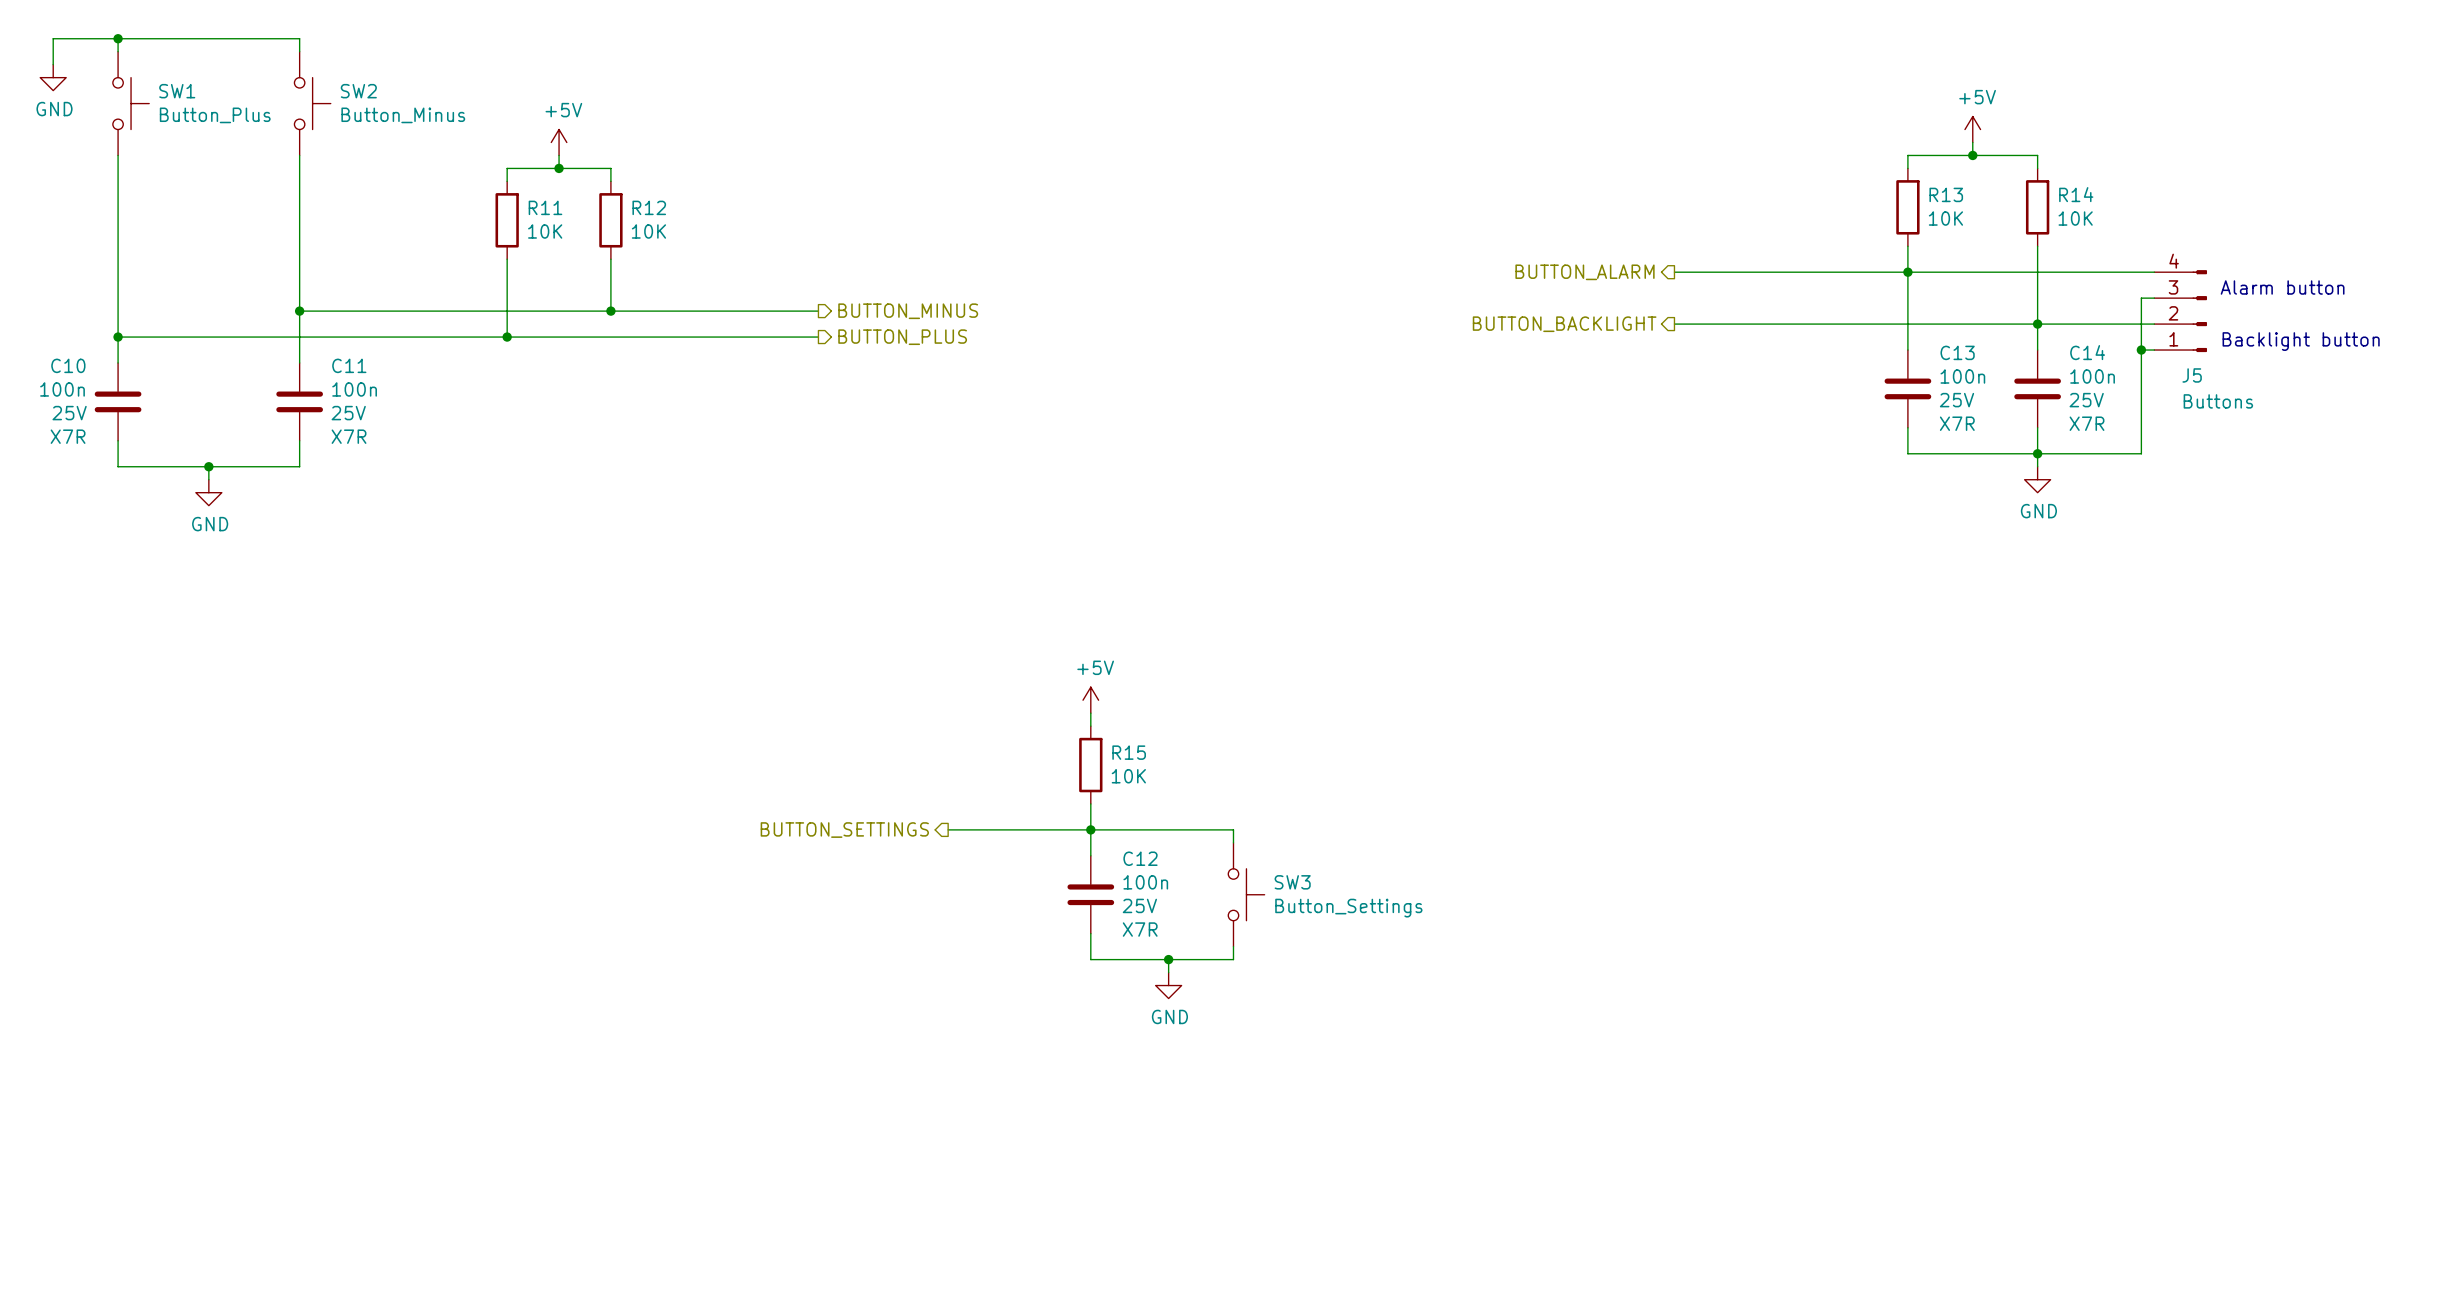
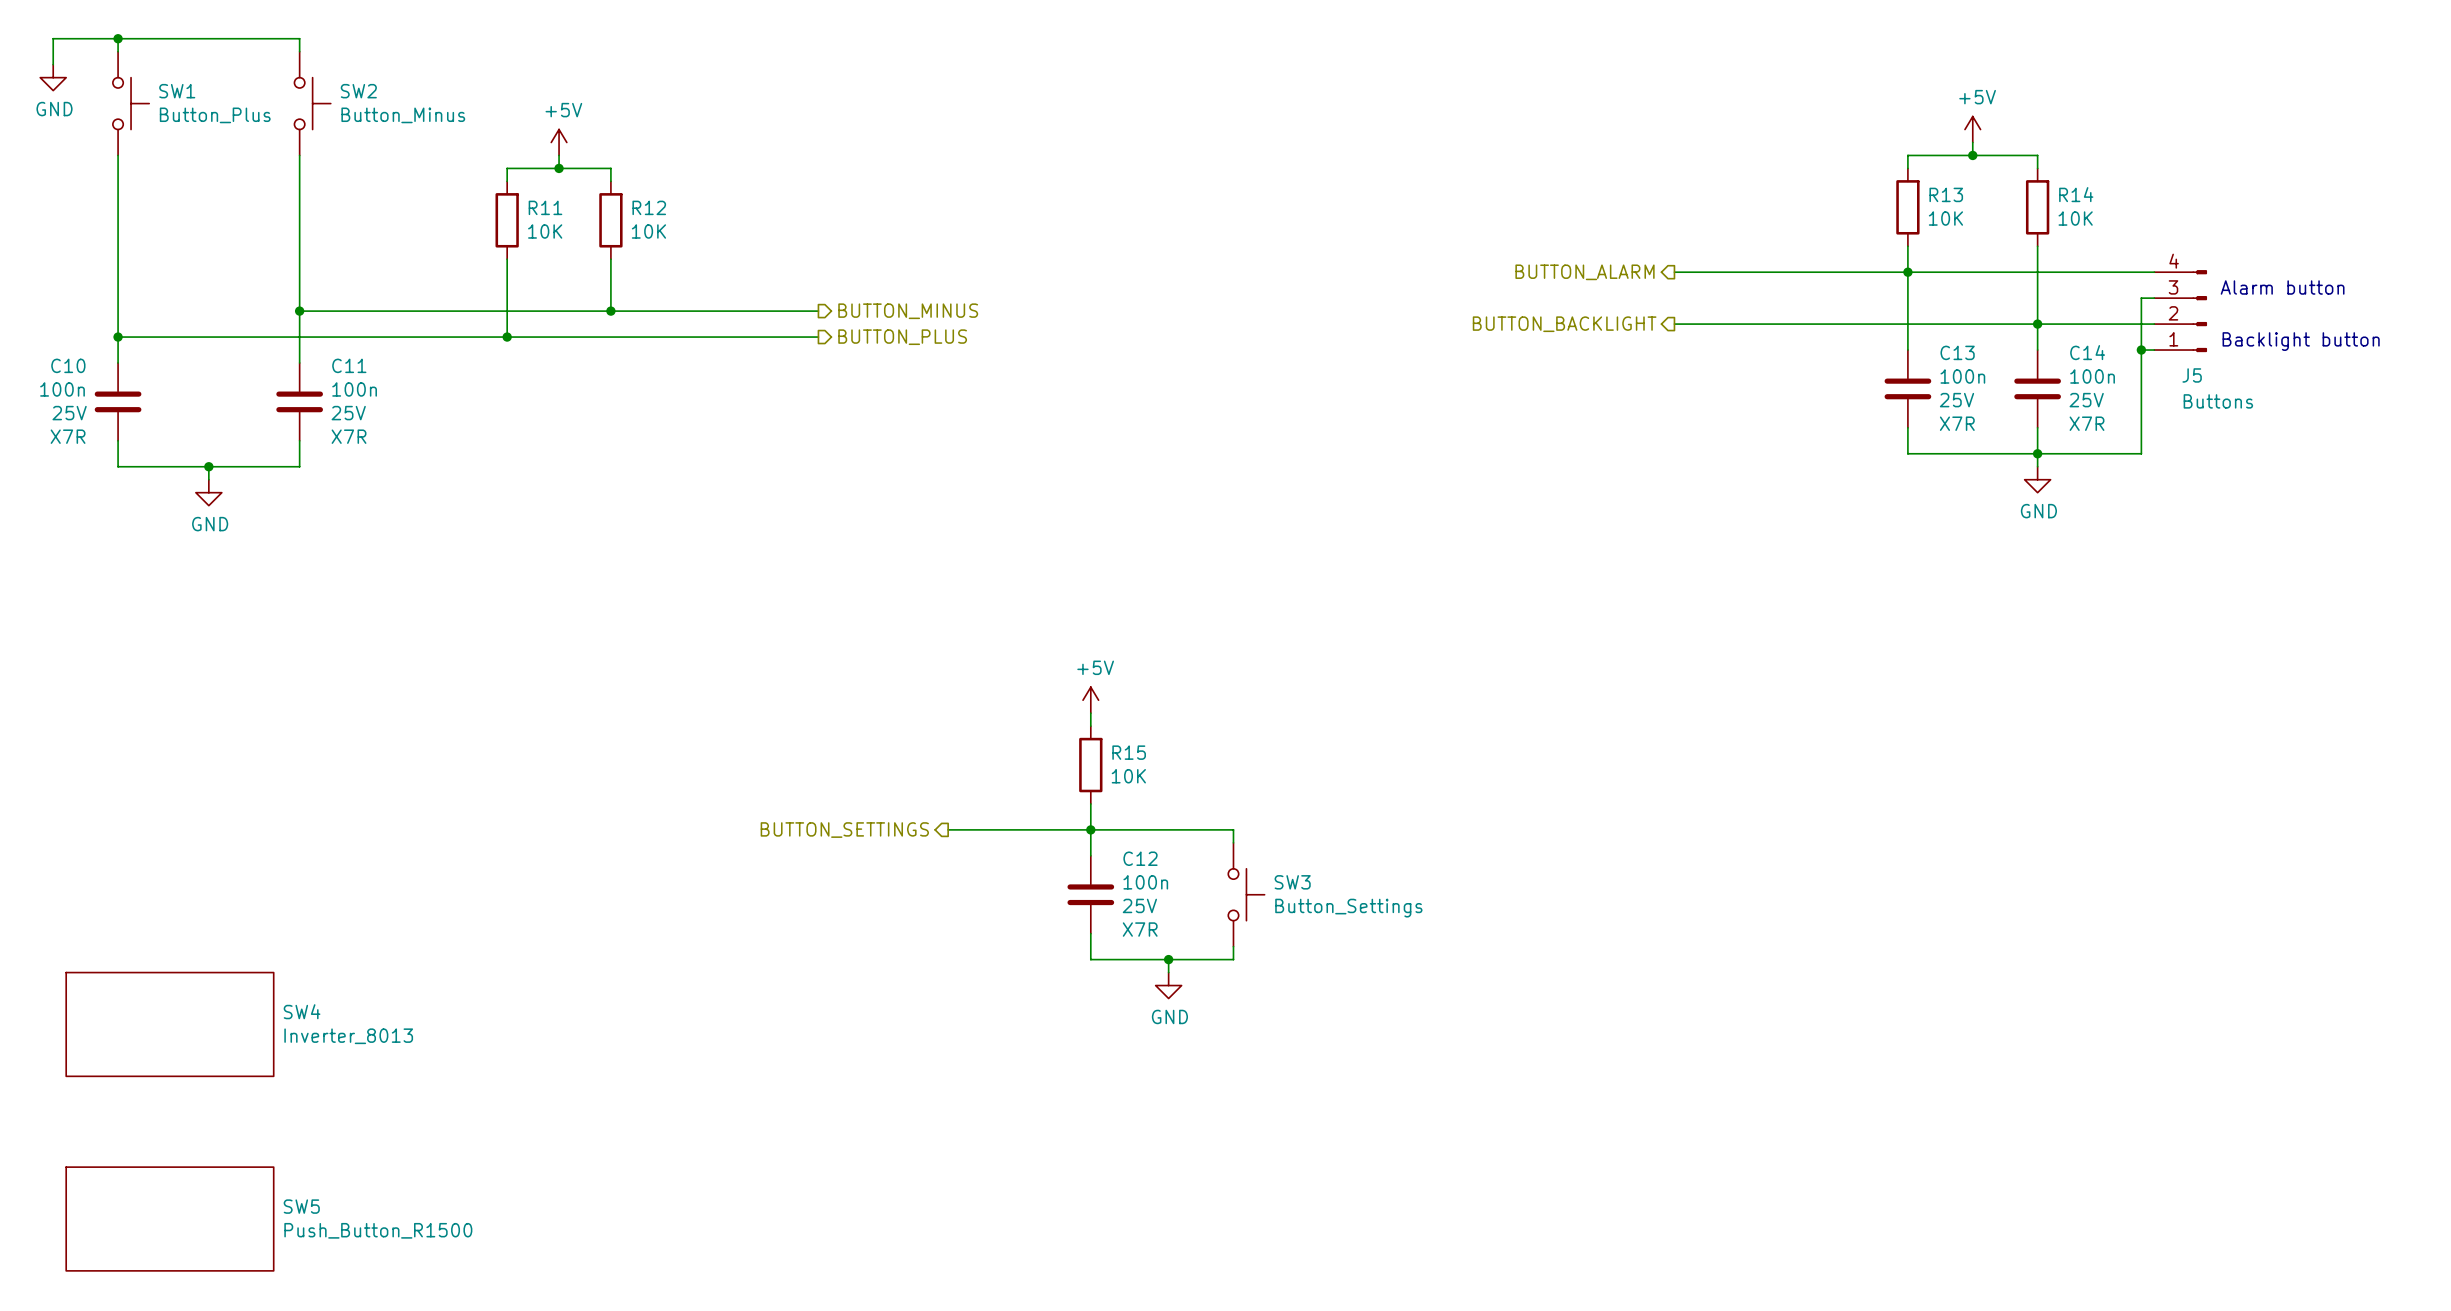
SW4: none -> Inverter_8013 (169, 1024)
SW5: none -> Push_Button_R1500 (169, 1219)

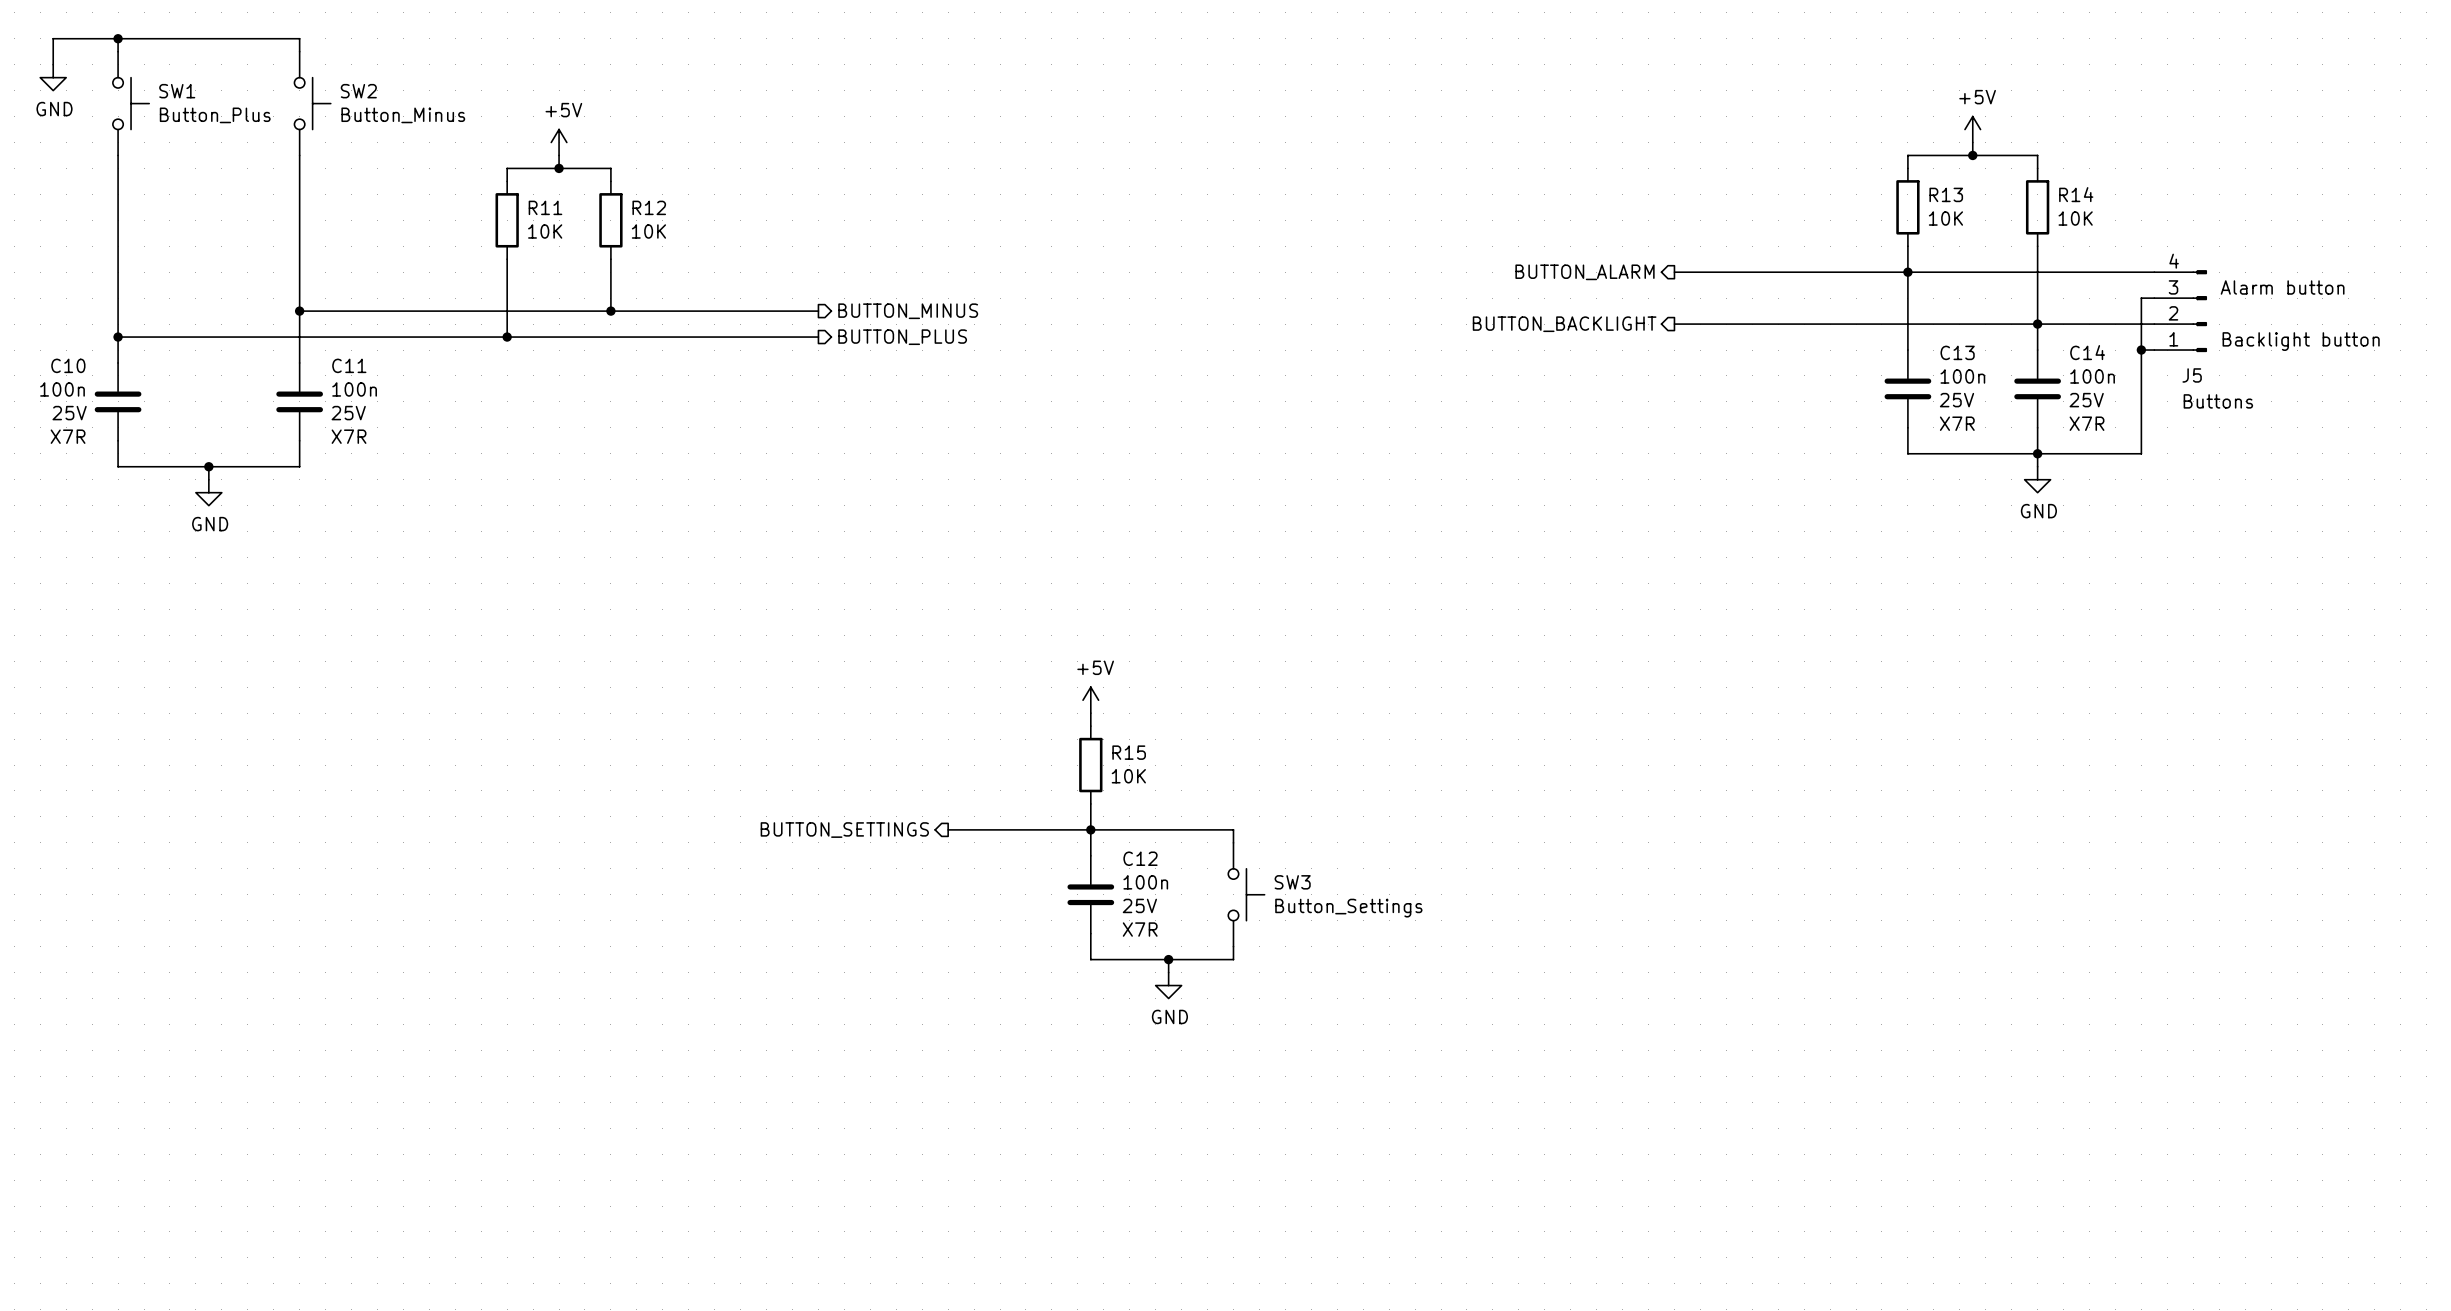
SW4: Inverter_8013 (169, 1024) -> none
SW5: Push_Button_R1500 (169, 1219) -> none

